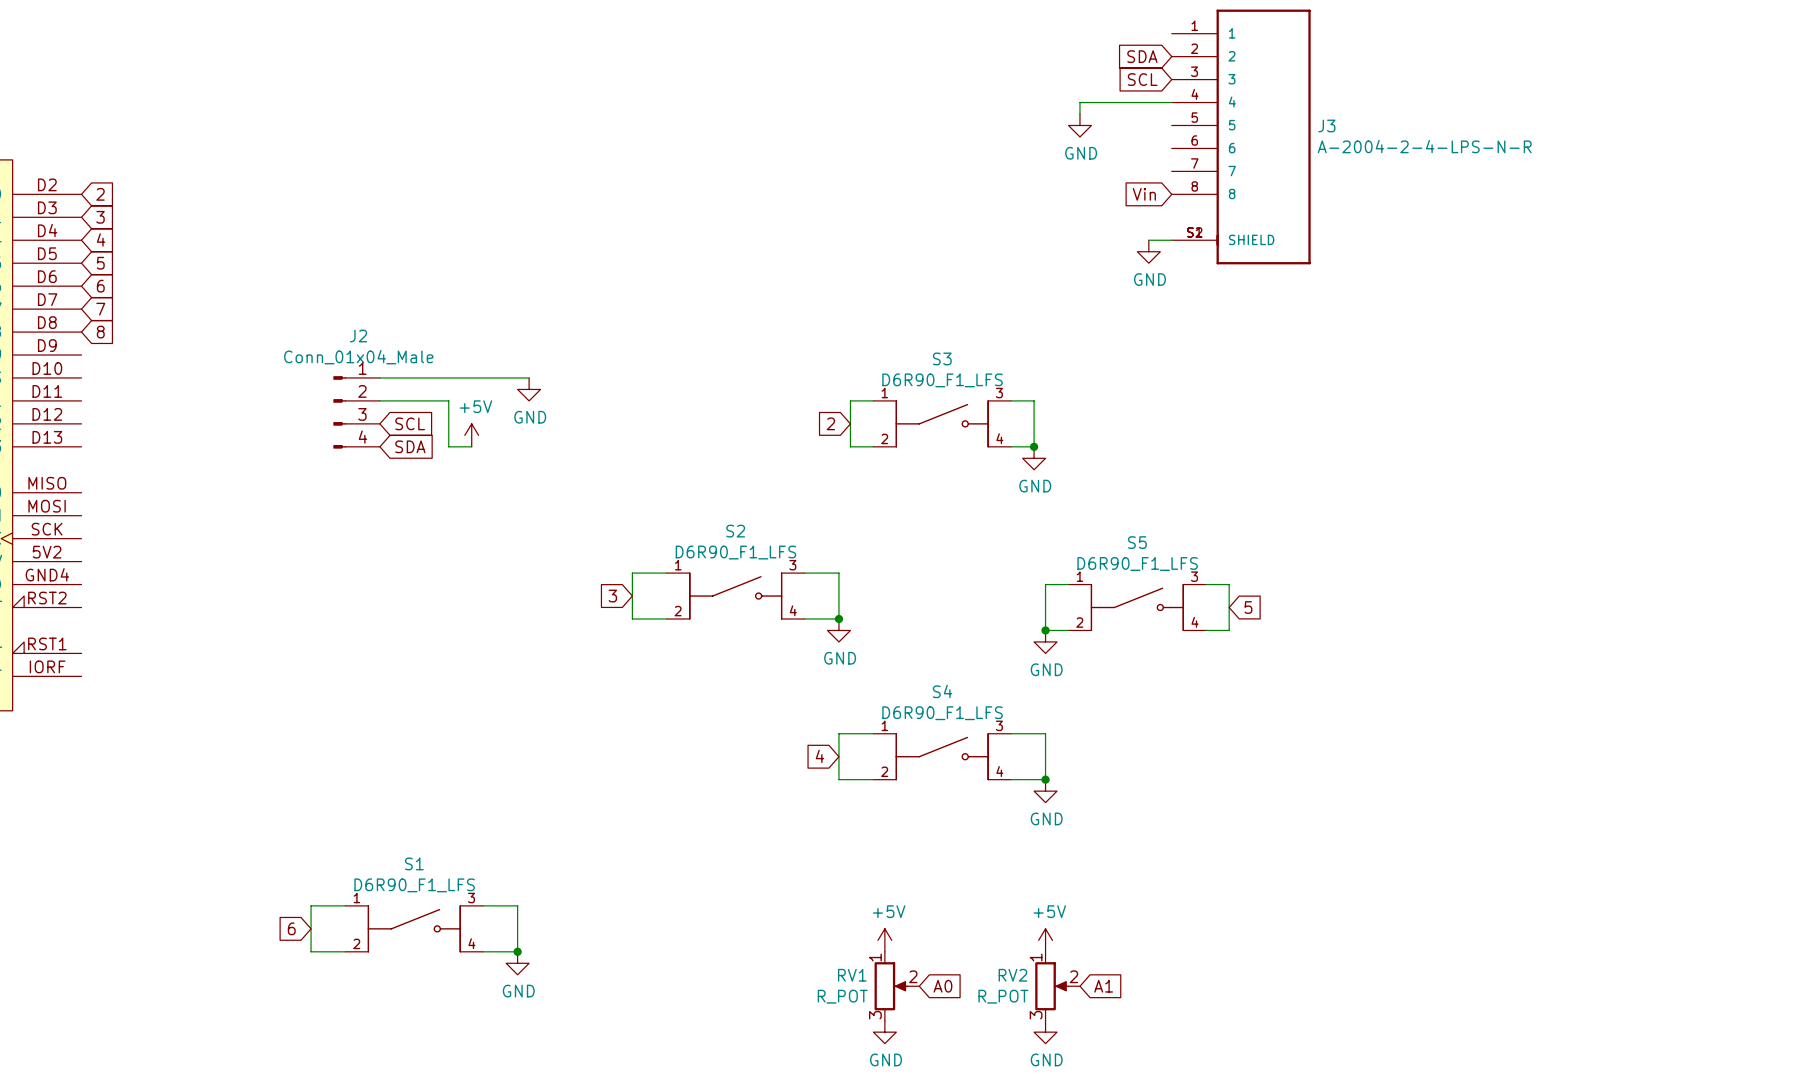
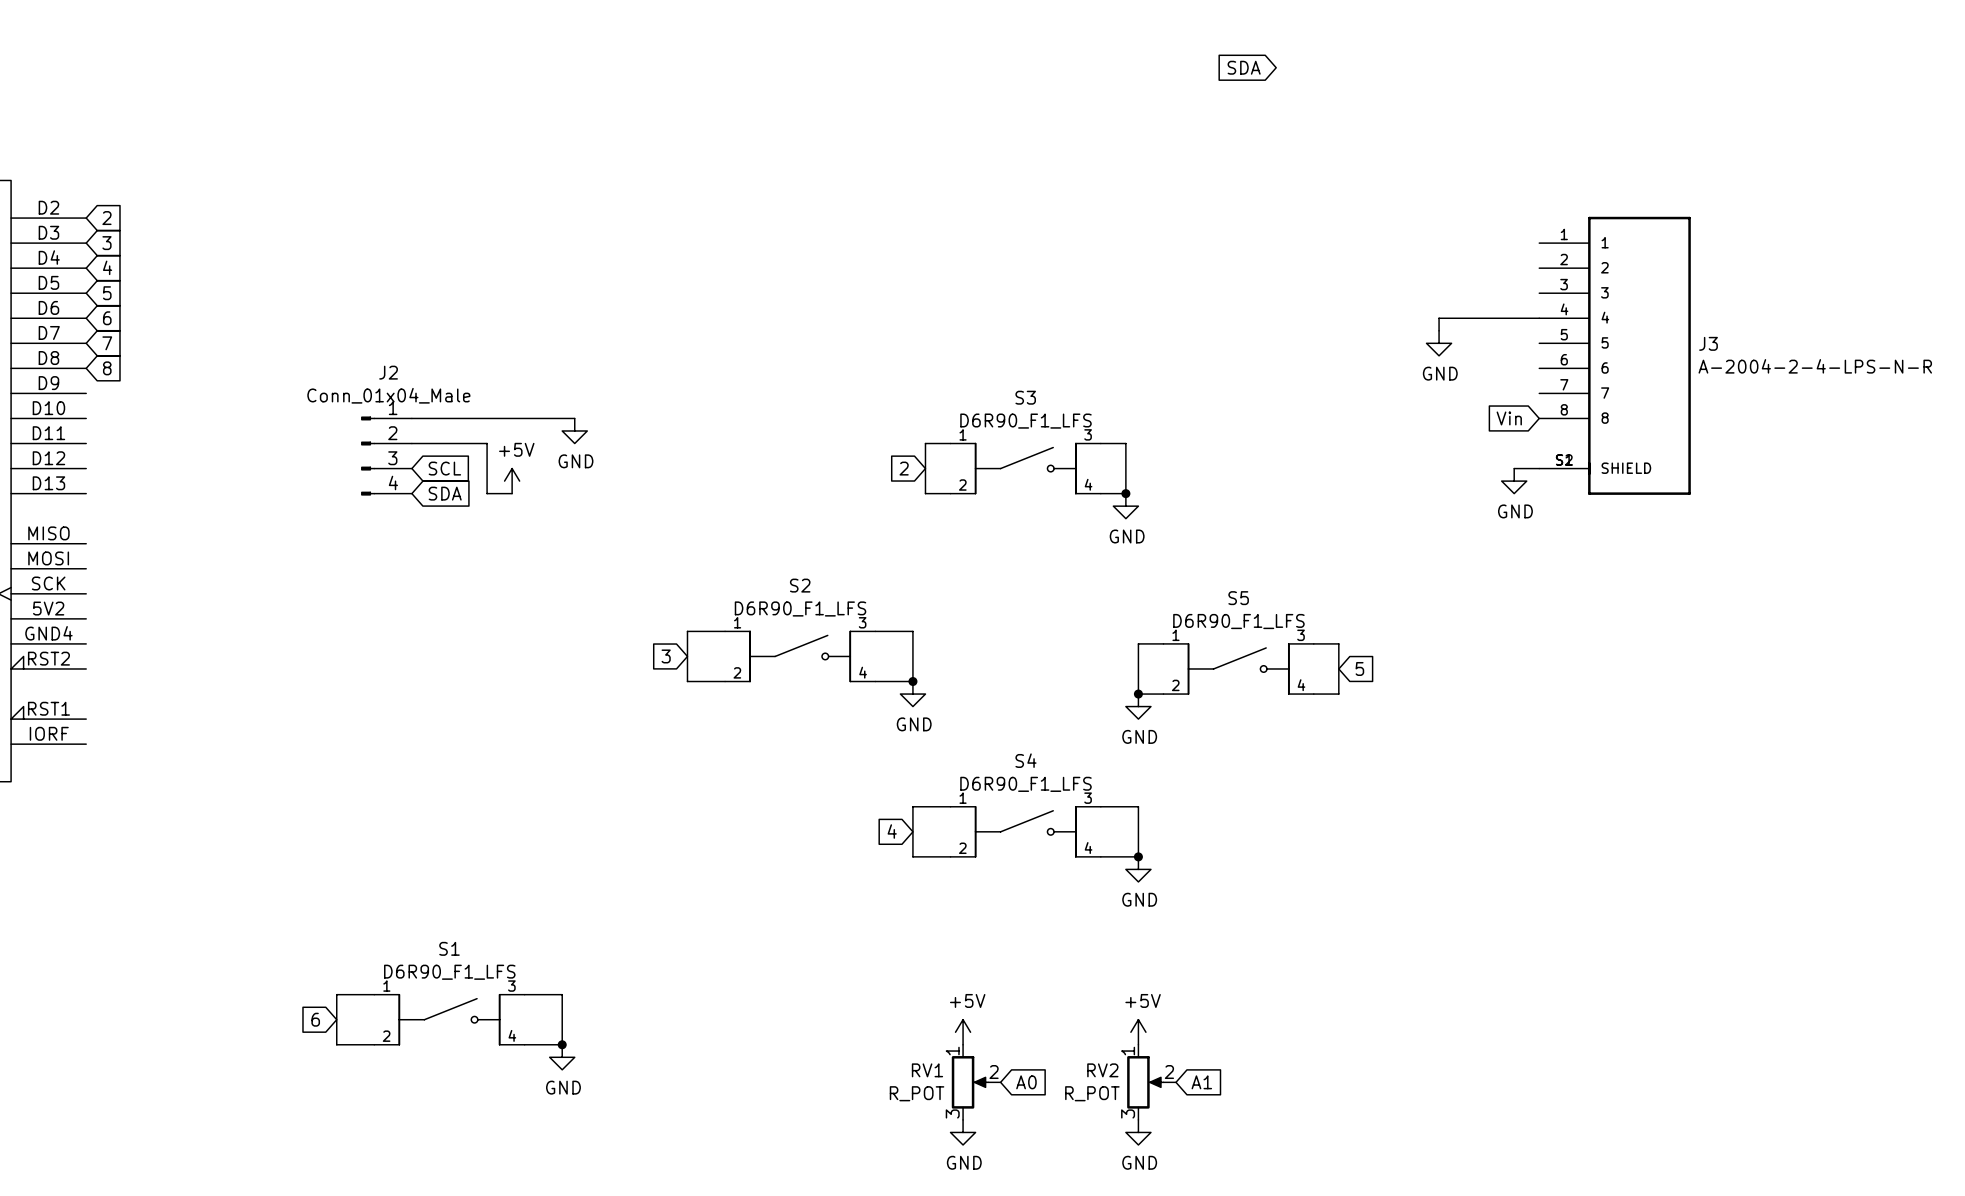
global label: SCL (1142, 79) -> none
wire: (1171, 102) (1079, 102) (1079, 114) -> none
power symbol: GND (1079, 125) -> none
J3 position: (1241, 136) -> (1615, 355)
global label: Vin (1144, 194) -> none
wire: (1148, 240) (1171, 240) -> none
power symbol: GND (1148, 251) -> none
wire: none -> (1539, 318) (1439, 318) (1439, 330)
power symbol: none -> GND (1439, 343)
global label: none -> Vin (1509, 418)
wire: none -> (1514, 468) (1539, 468)
power symbol: none -> GND (1514, 481)

